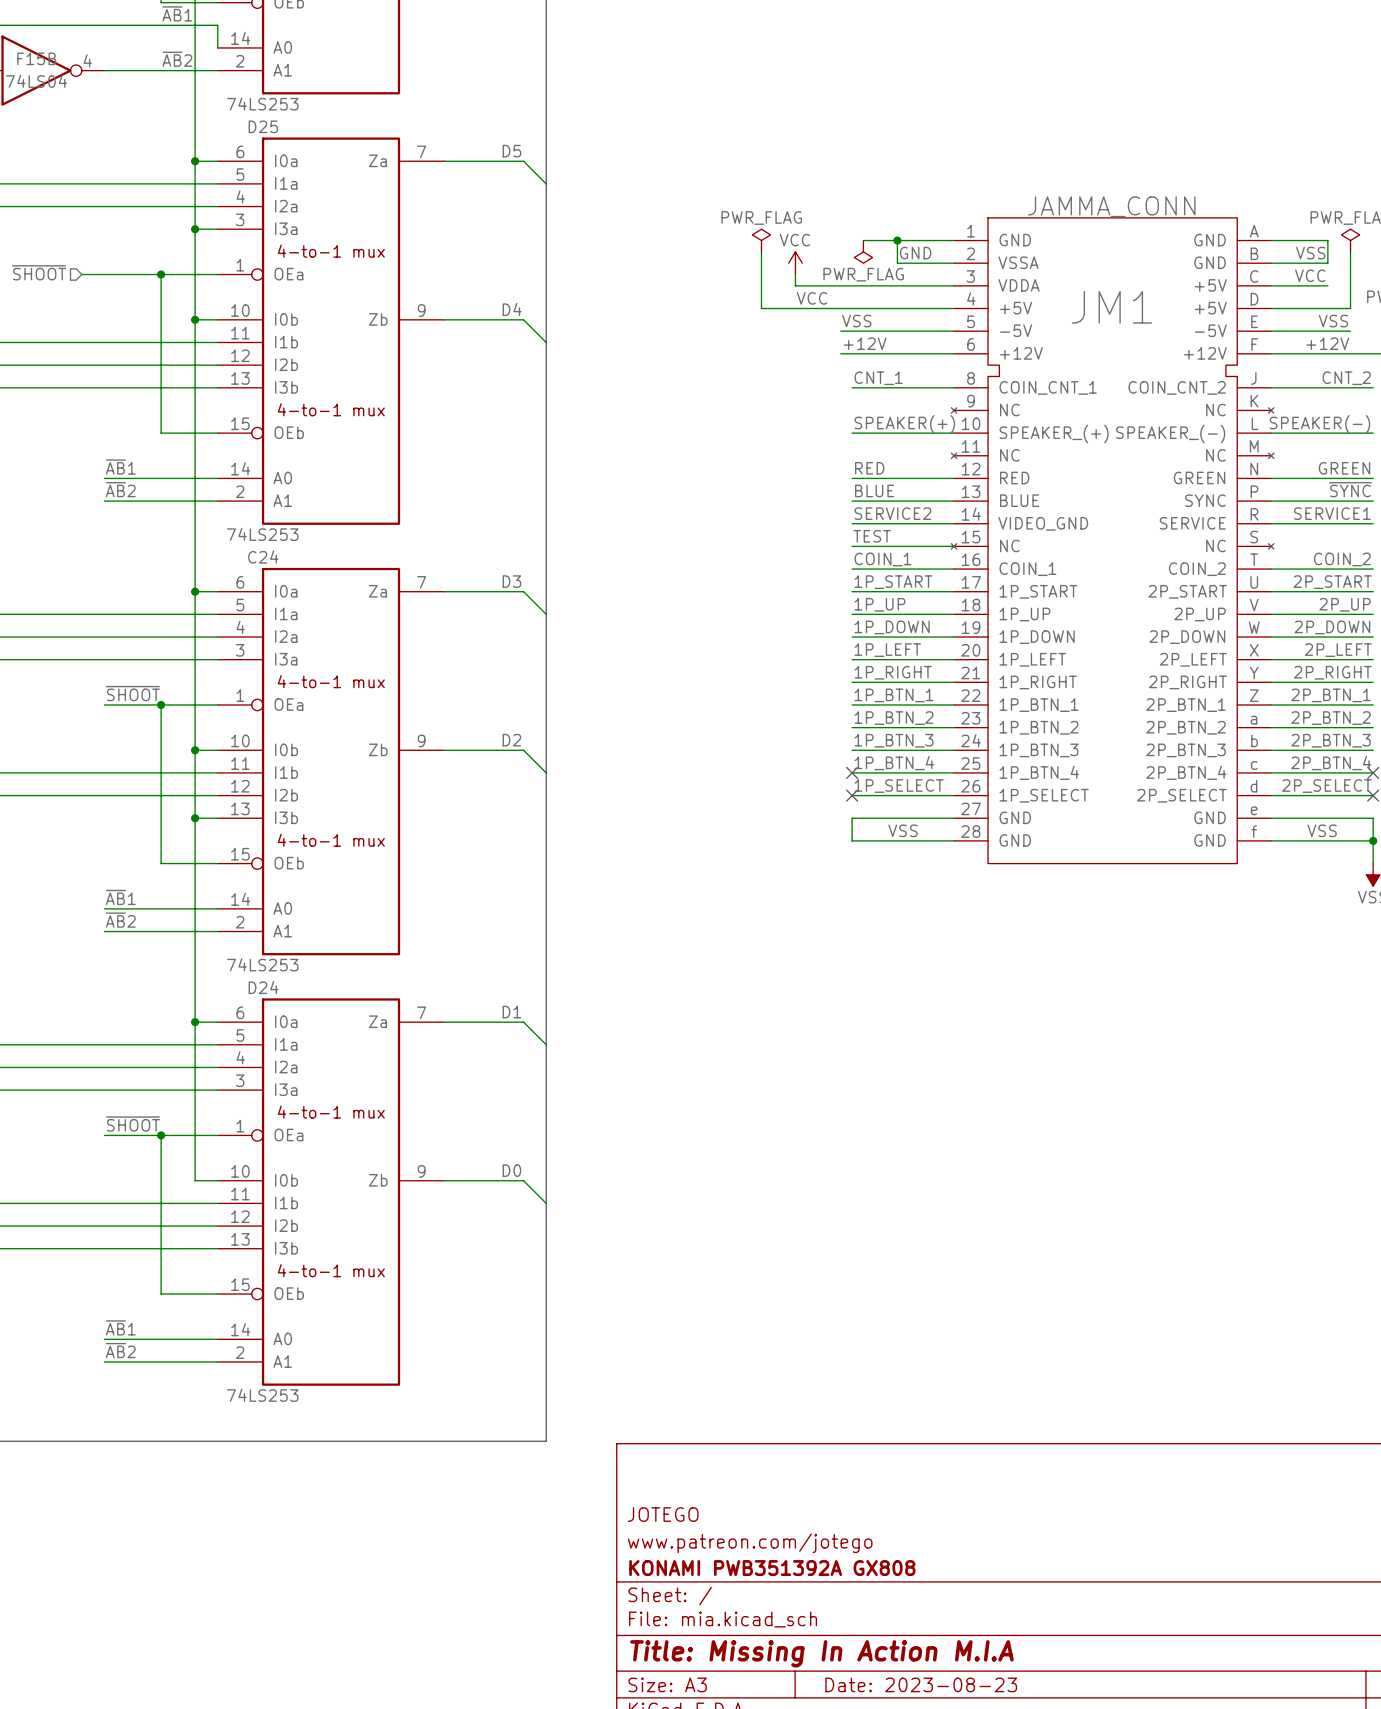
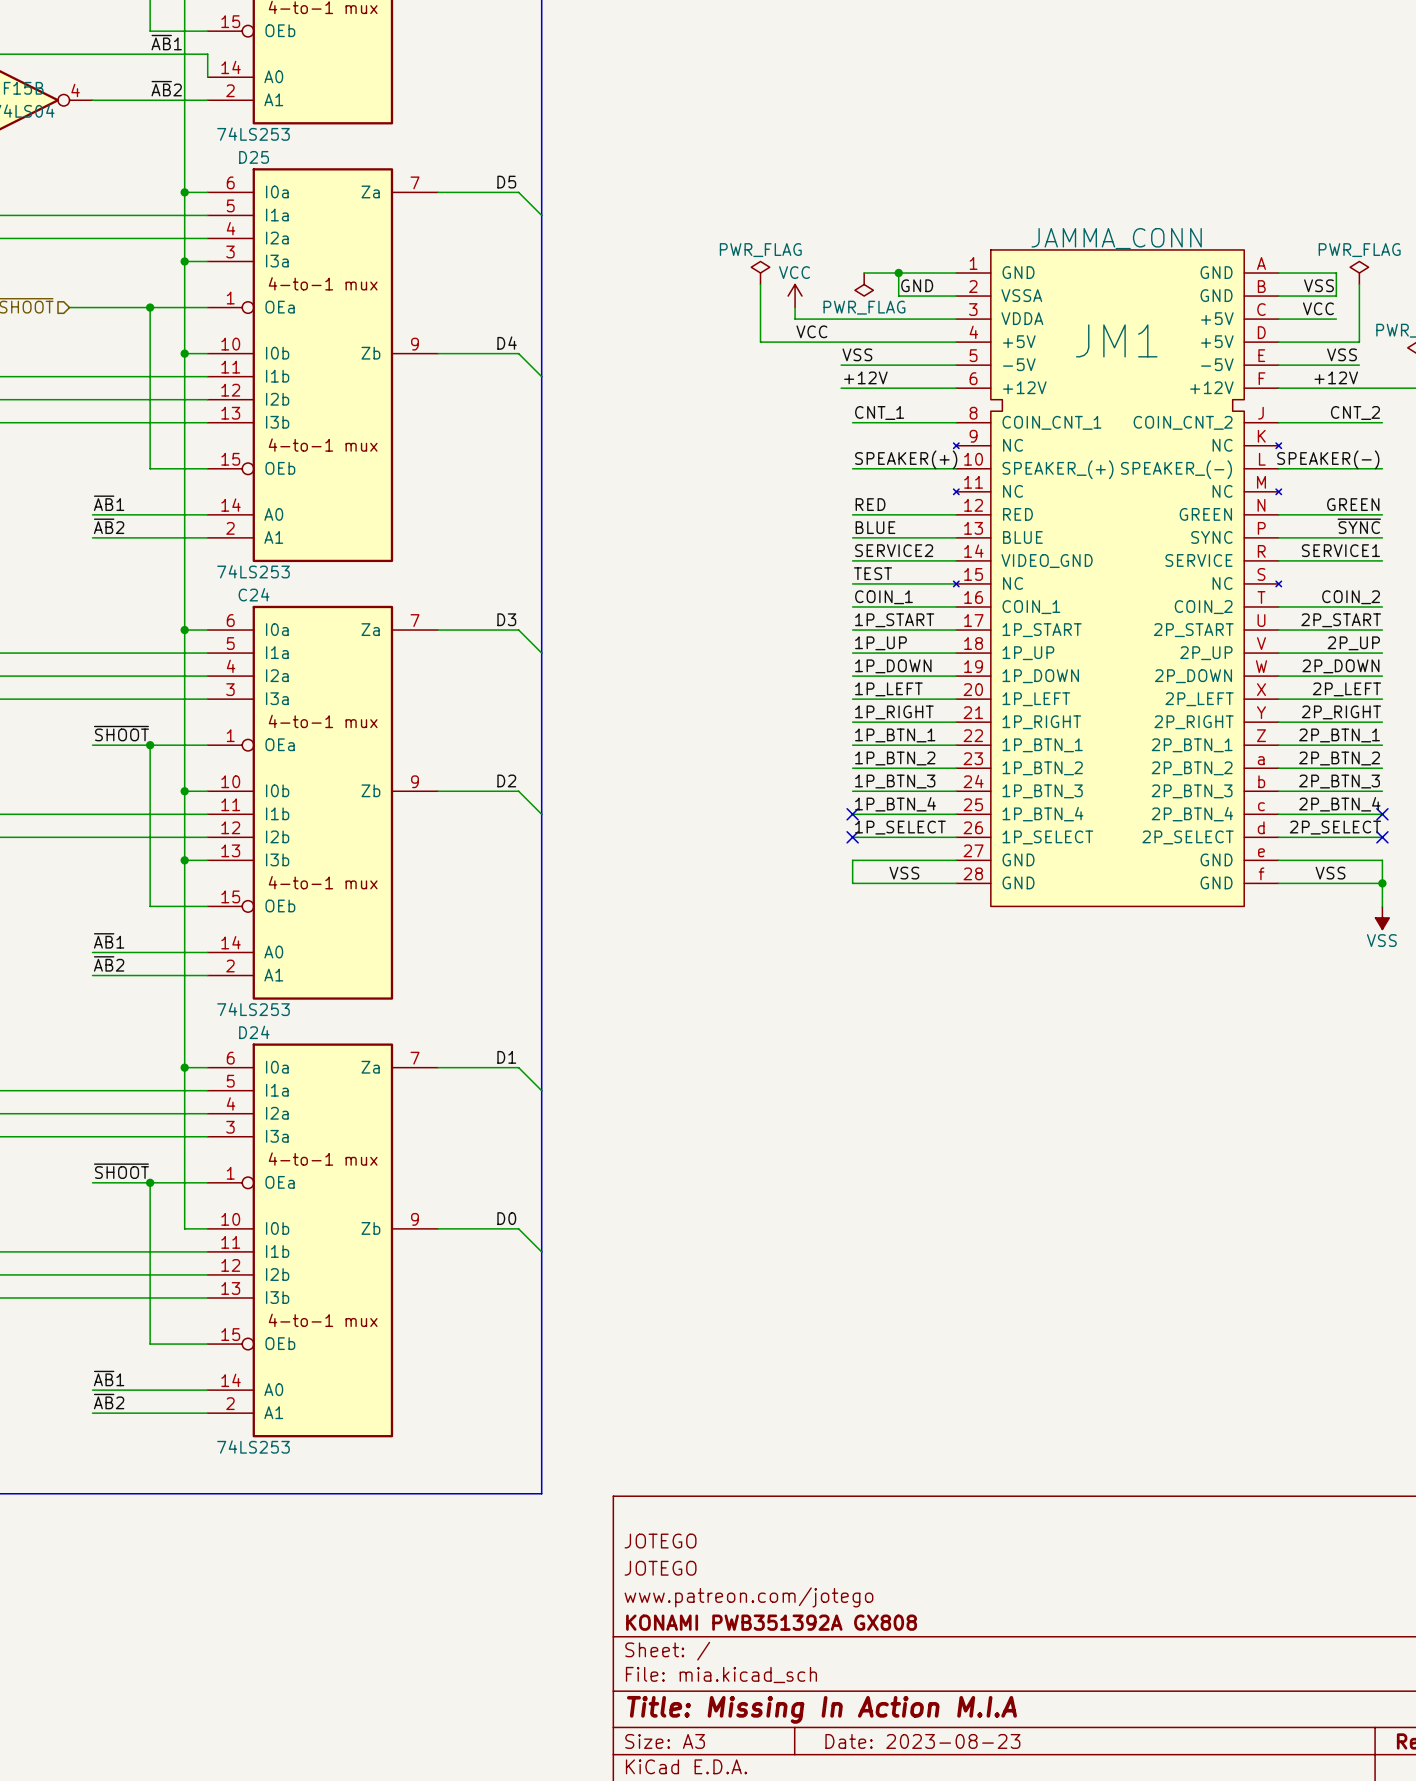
title block: none -> JOTEGO (660, 1541)

